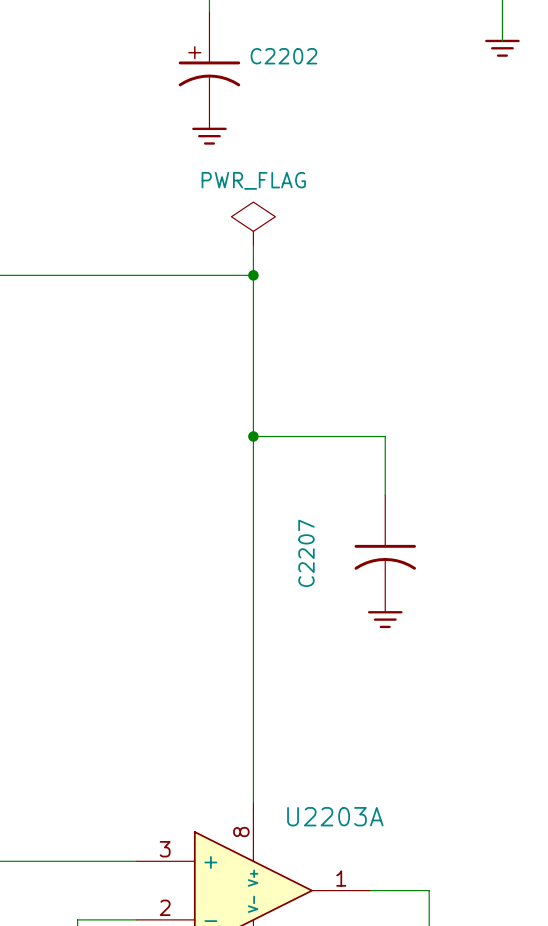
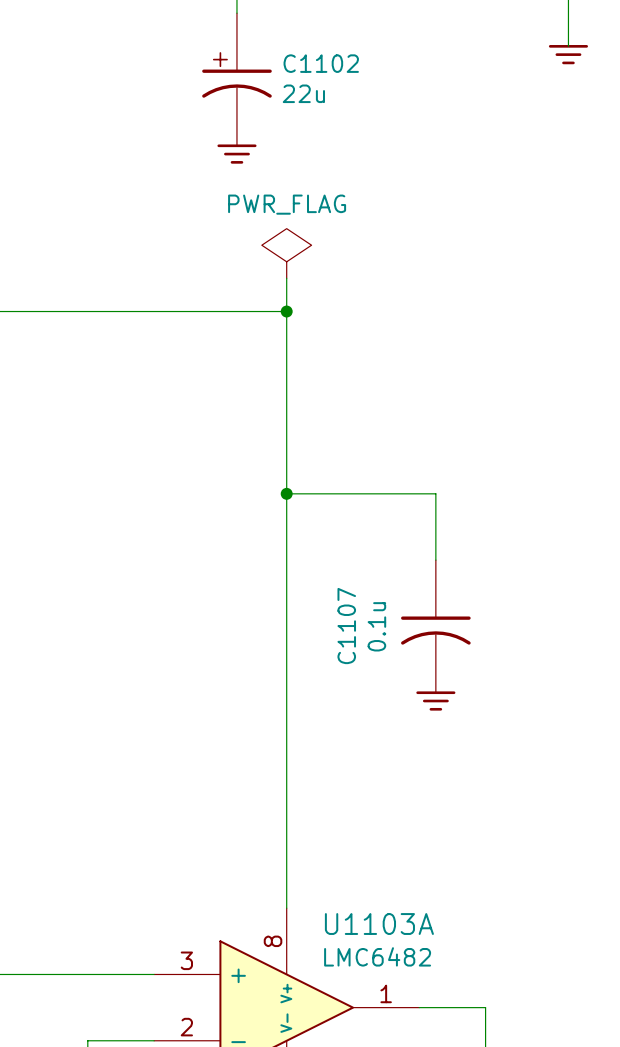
C2202 name: C2202 (283, 56) -> C1102 (321, 63)
C2202 value: none -> 22u (303, 93)
C2207 name: C2207 (306, 553) -> C1107 (346, 626)
C2207 value: none -> 0.1u (376, 626)
U2203A name: U2203A (335, 816) -> U1103A (379, 924)
U2203A value: none -> LMC6482 (377, 956)

